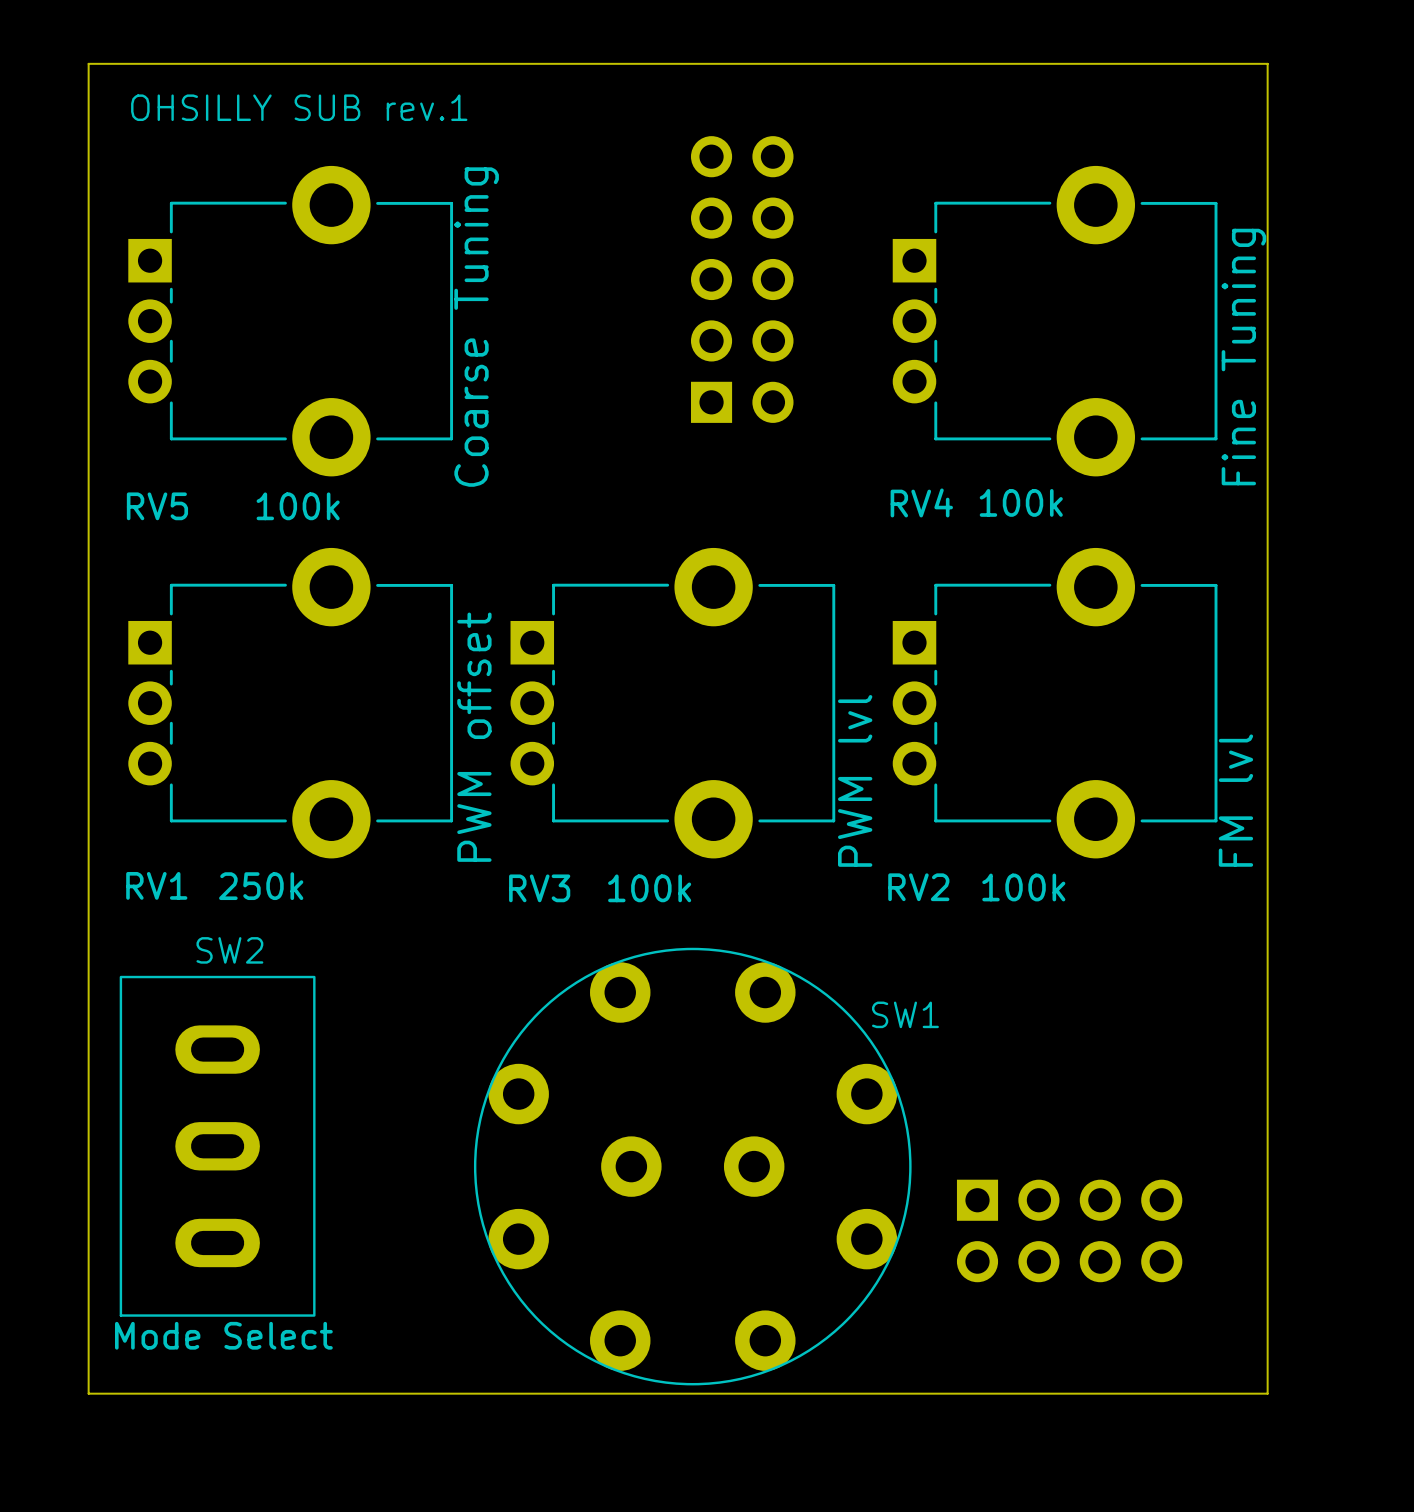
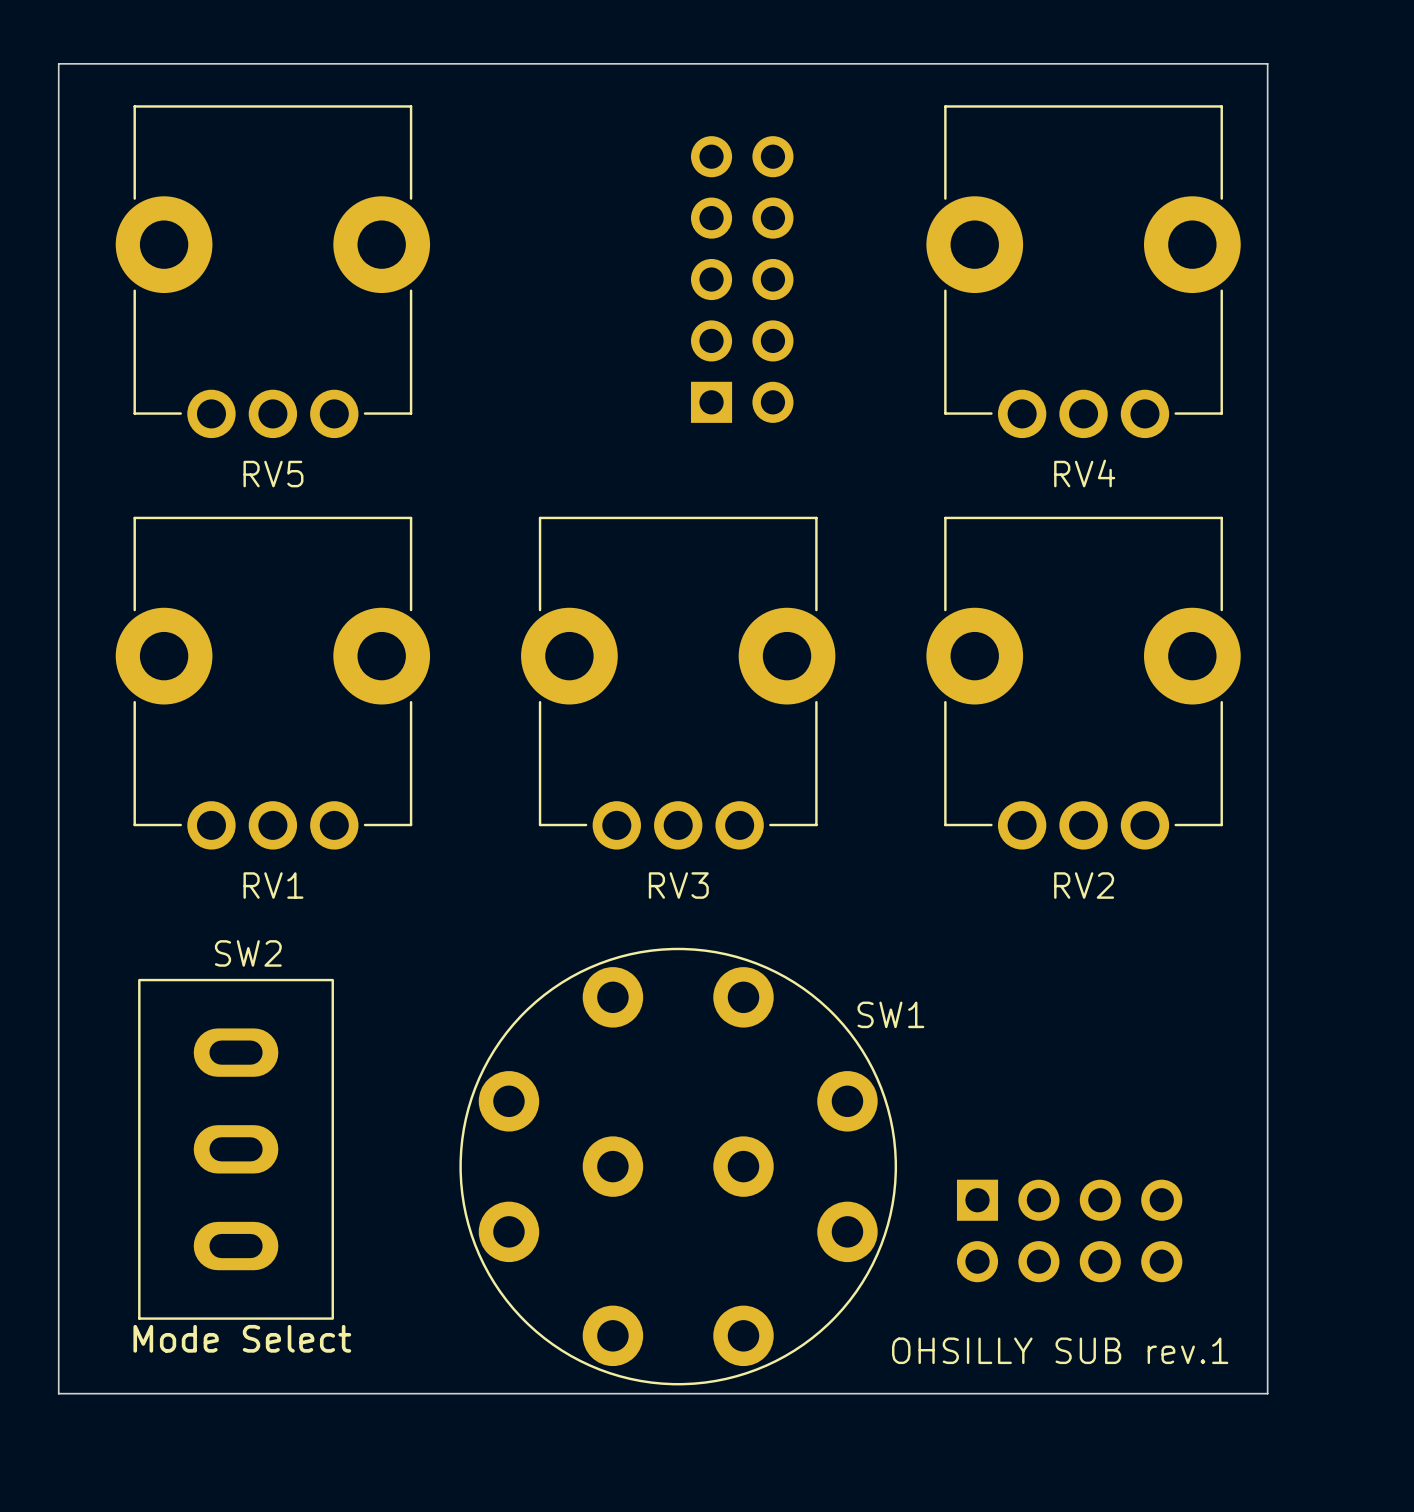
board edge: (88, 63) (88, 1393) -> (88, 63) (58, 63) (58, 1393) (88, 1393)
text: OHSILLY SUB rev.1 (299, 107) -> none
RV5 footprint: [128, 165, 454, 477] -> [115, 105, 431, 439]
RV4 footprint: [892, 165, 1218, 477] -> [926, 105, 1241, 439]
RV5 text: Coarse Tuning (476, 327) -> none
RV4 text: Fine Tuning (1243, 357) -> none
RV4 name position: RV4 (921, 502) -> RV4 (1084, 473)
RV4 value: 100k (1021, 502) -> none
RV5 name position: RV5 (157, 506) -> RV5 (273, 474)
RV5 value: 100k (298, 506) -> none
RV1 footprint: [128, 547, 454, 859] -> [115, 516, 431, 850]
RV3 footprint: [510, 547, 836, 859] -> [521, 516, 836, 850]
RV2 footprint: [892, 547, 1218, 859] -> [926, 516, 1241, 850]
RV1 text: PWM offset (474, 737) -> none
RV3 text: PWM lvl (855, 780) -> none
RV2 text: FM lvl (1235, 800) -> none
RV1 name position: RV1 (156, 885) -> RV1 (273, 885)
RV1 value: 250k (261, 886) -> none
RV2 name position: RV2 (918, 887) -> RV2 (1084, 885)
RV2 value: 100k (1023, 887) -> none
RV3 name position: RV3 (539, 888) -> RV3 (678, 885)
RV3 value: 100k (649, 888) -> none
SW1 footprint: [473, 947, 912, 1386] -> [459, 947, 898, 1386]
SW1 name position: SW1 (905, 1014) -> SW1 (890, 1014)
SW2 position: (217, 1146) -> (236, 1149)
text: none -> OHSILLY SUB rev.1 (1060, 1350)

